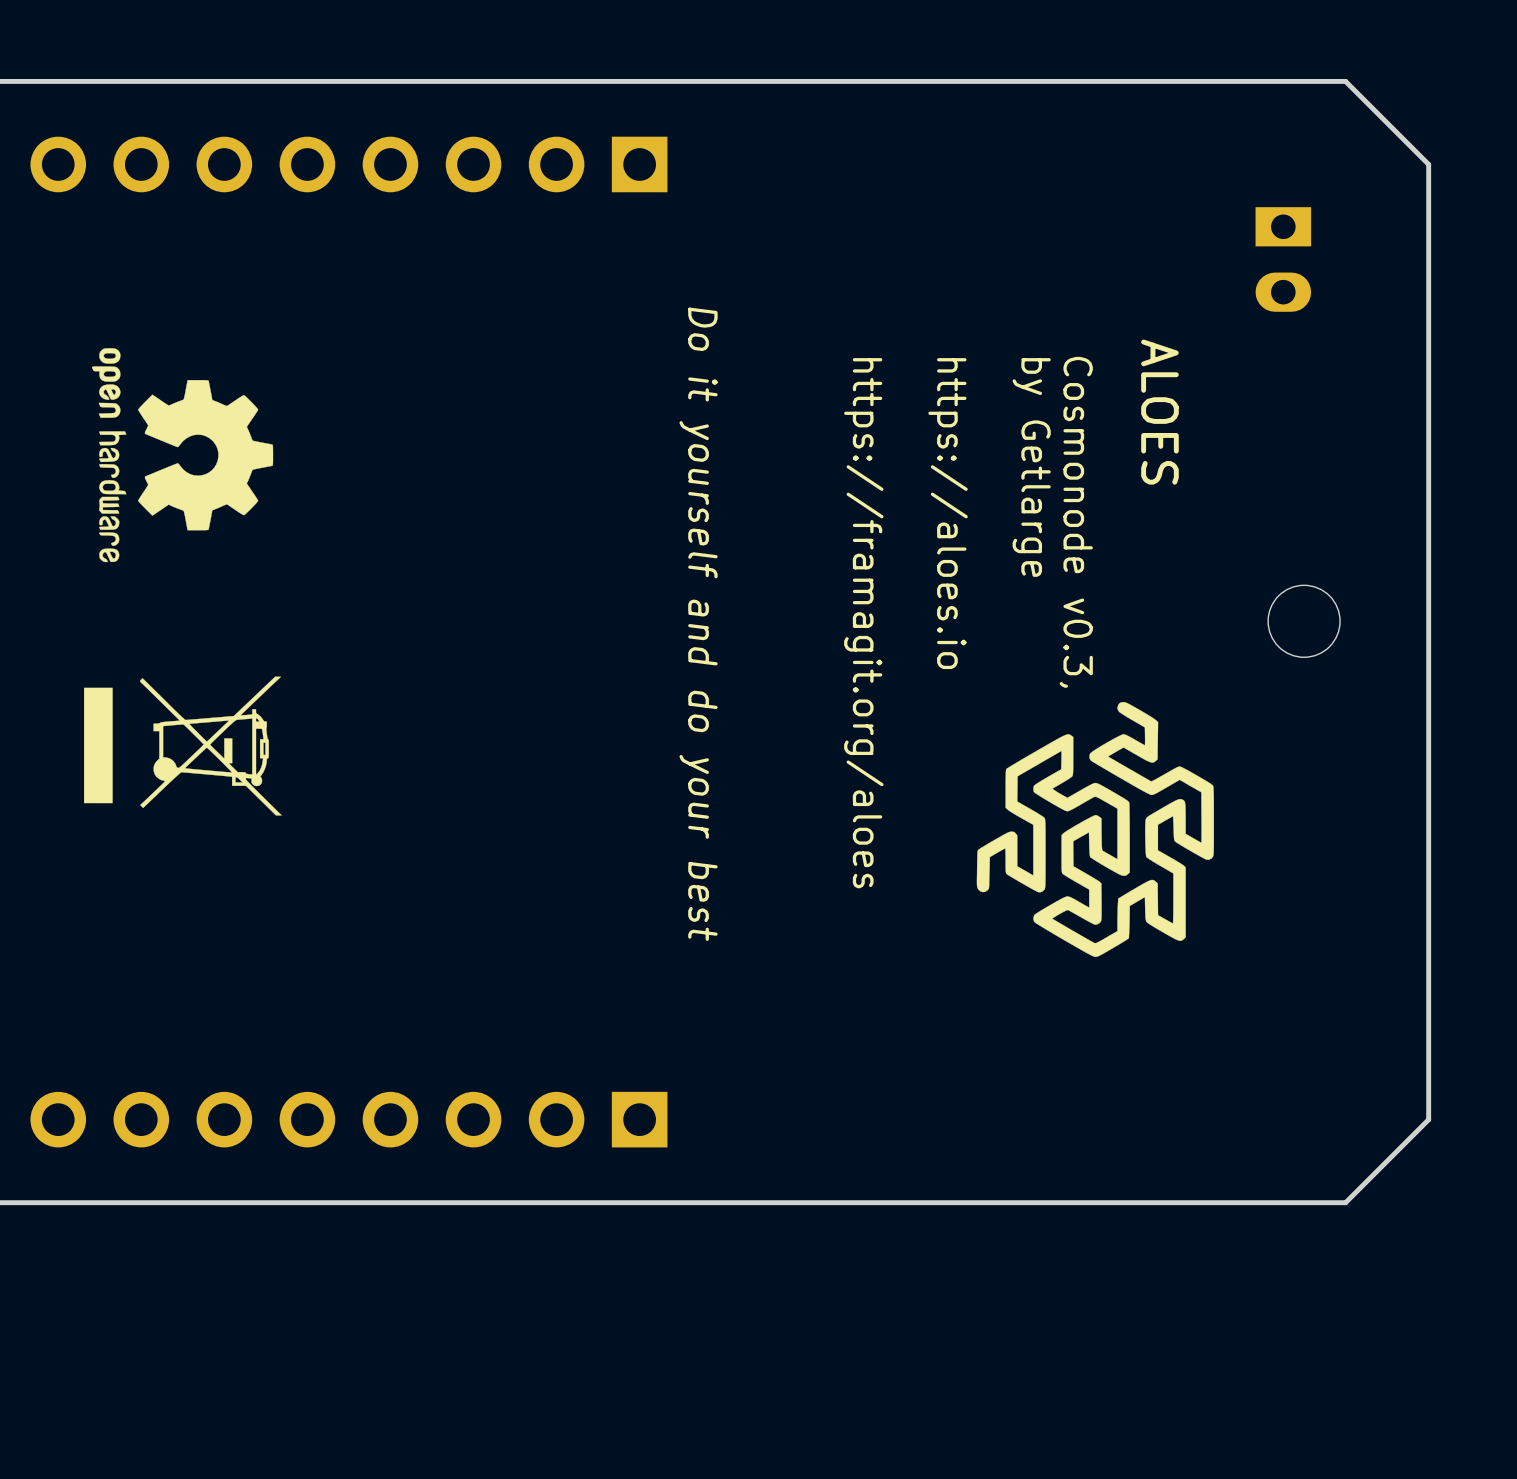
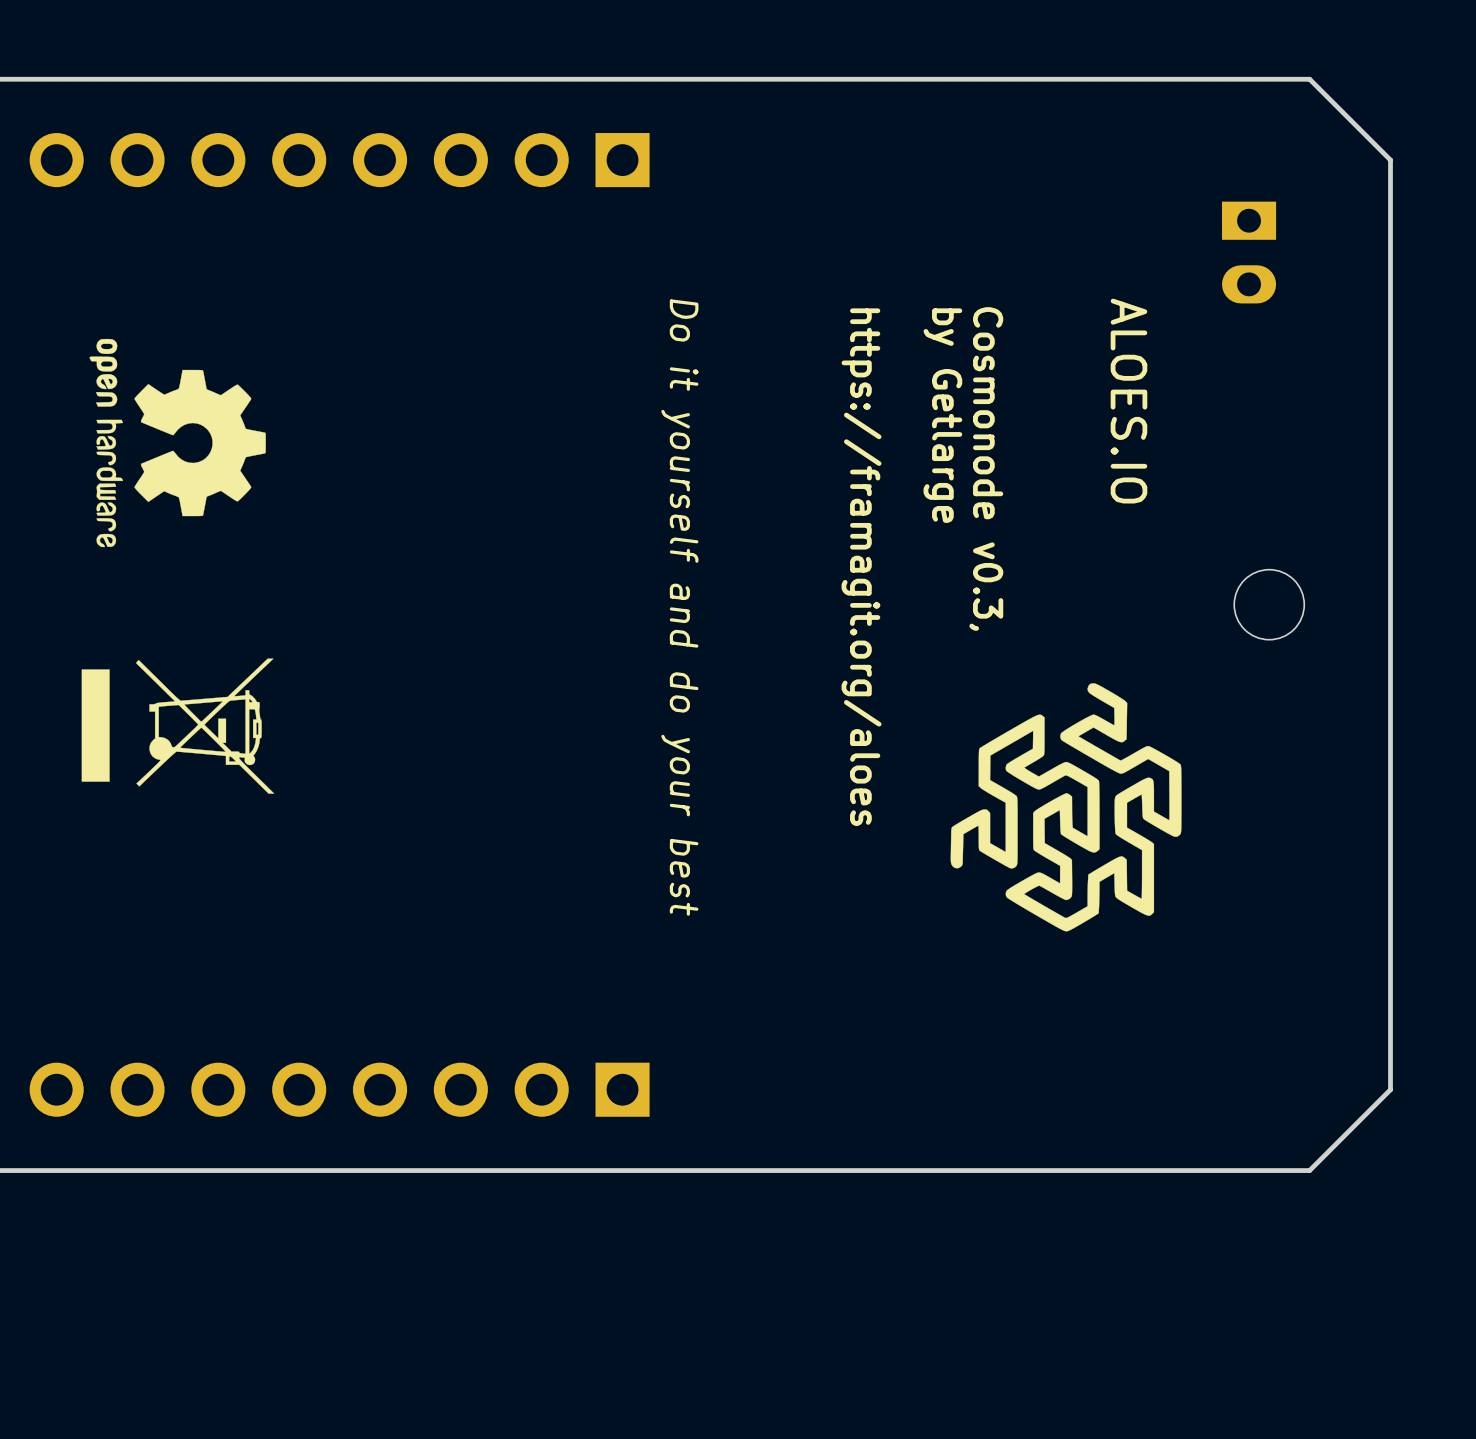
text: ALOES (1159, 412) -> ALOES.IO (1128, 401)
text position: by Getlarge (1031, 467) -> by Getlarge (942, 415)
text: https://aloes.io (948, 513) -> none
text position: Cosmonode v0.3, (1076, 522) -> Cosmonode v0.3, (986, 468)
text position: https://framagit.org/aloes (863, 623) -> https://framagit.org/aloes (861, 567)

